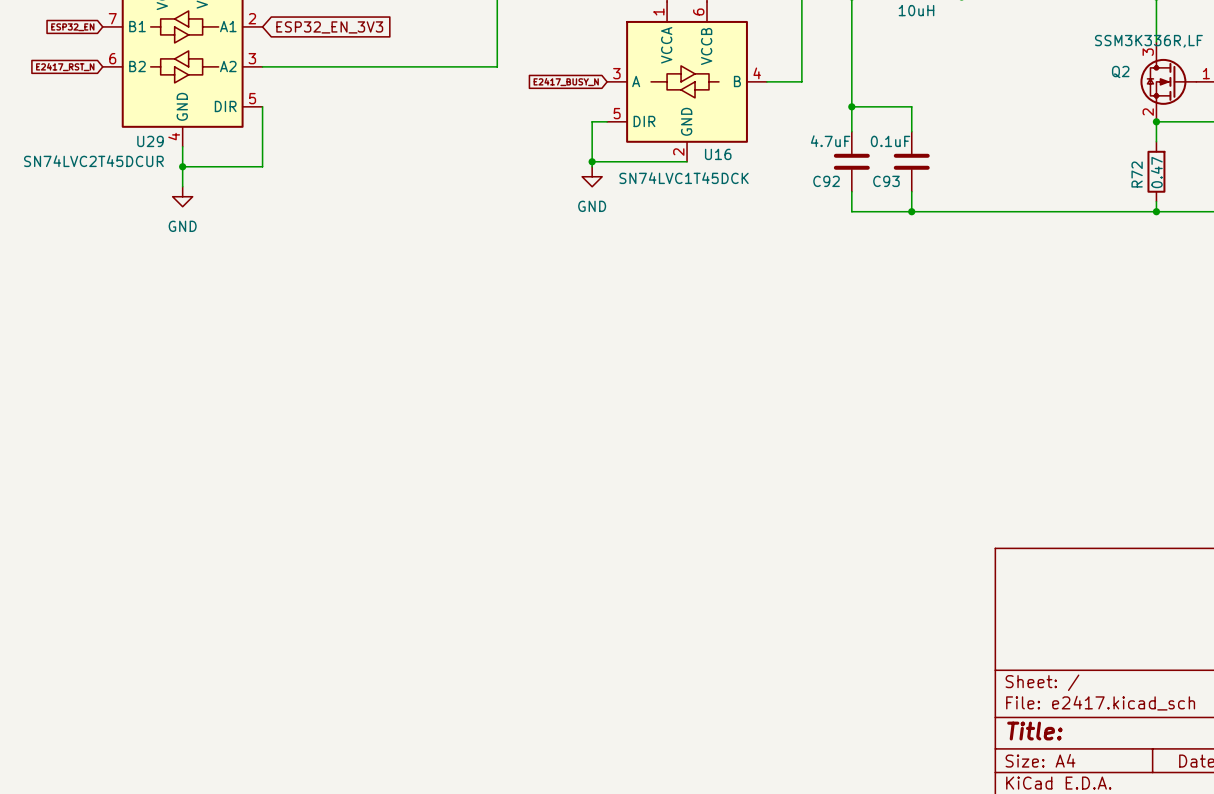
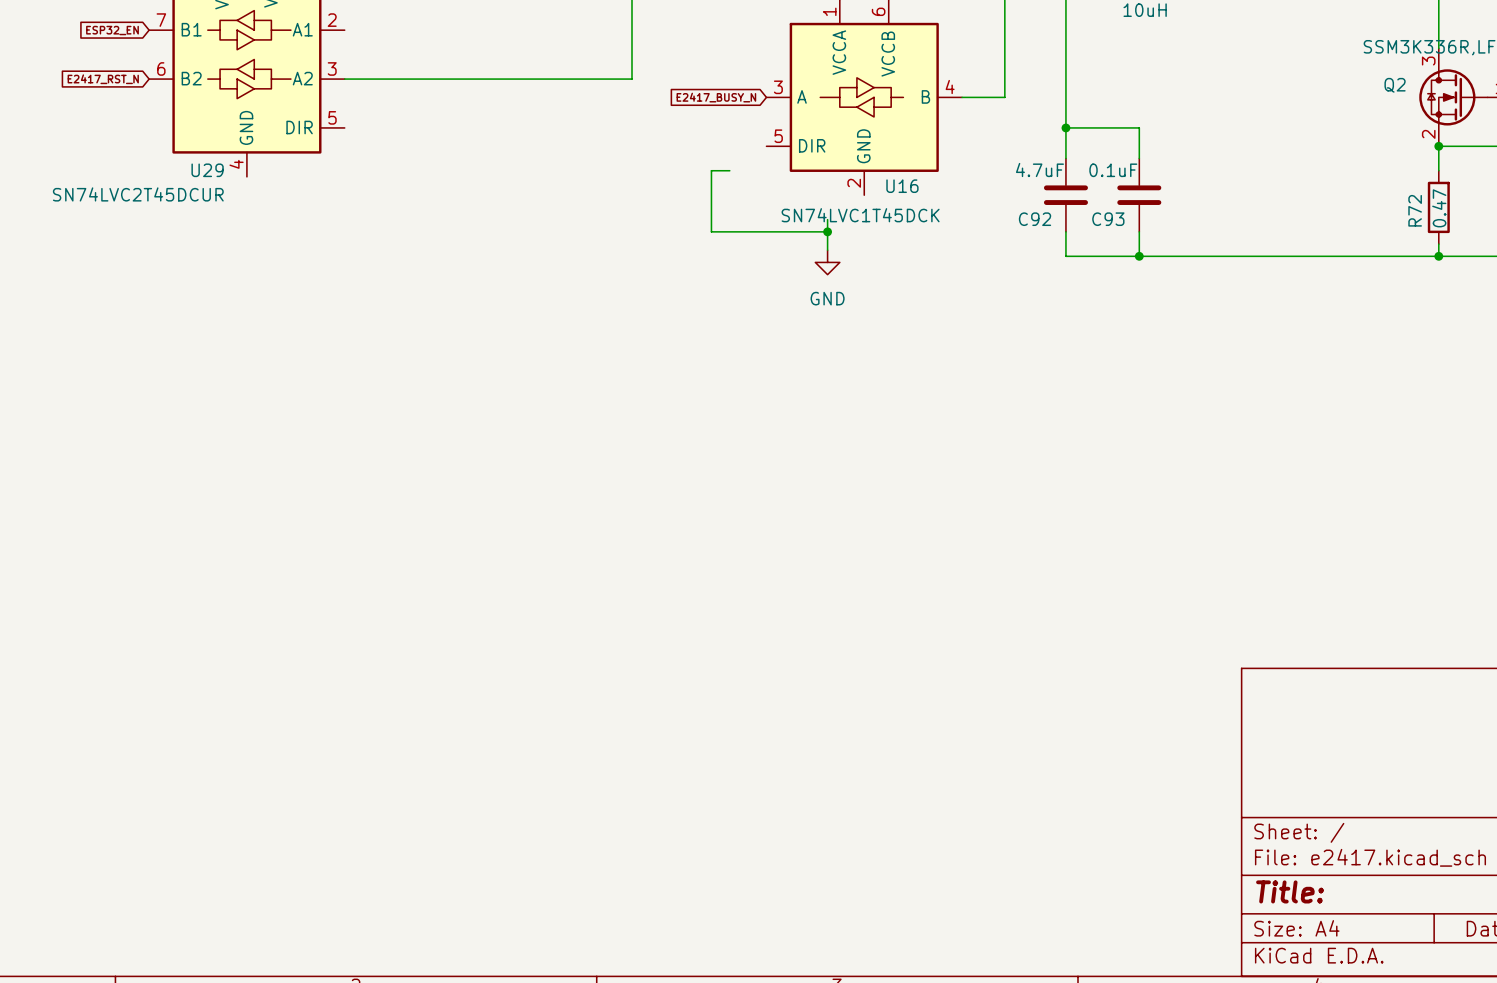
global label: ESP32_EN_3V3 (329, 27) -> none
wire: (262, 106) (262, 166) (182, 166) -> none
wire: (607, 121) (592, 121) (592, 166) -> none
wire: none -> (729, 170) (711, 170) (711, 231) (827, 231)
wire: (182, 146) (182, 186) -> none
wire: (592, 161) (687, 161) -> none
junction: (592, 161) -> none
junction: (182, 166) -> none
power symbol position: GND (592, 176) -> GND (827, 262)
wire: none -> (827, 219) (827, 250)
junction: none -> (827, 231)
power symbol: GND (182, 196) -> none

